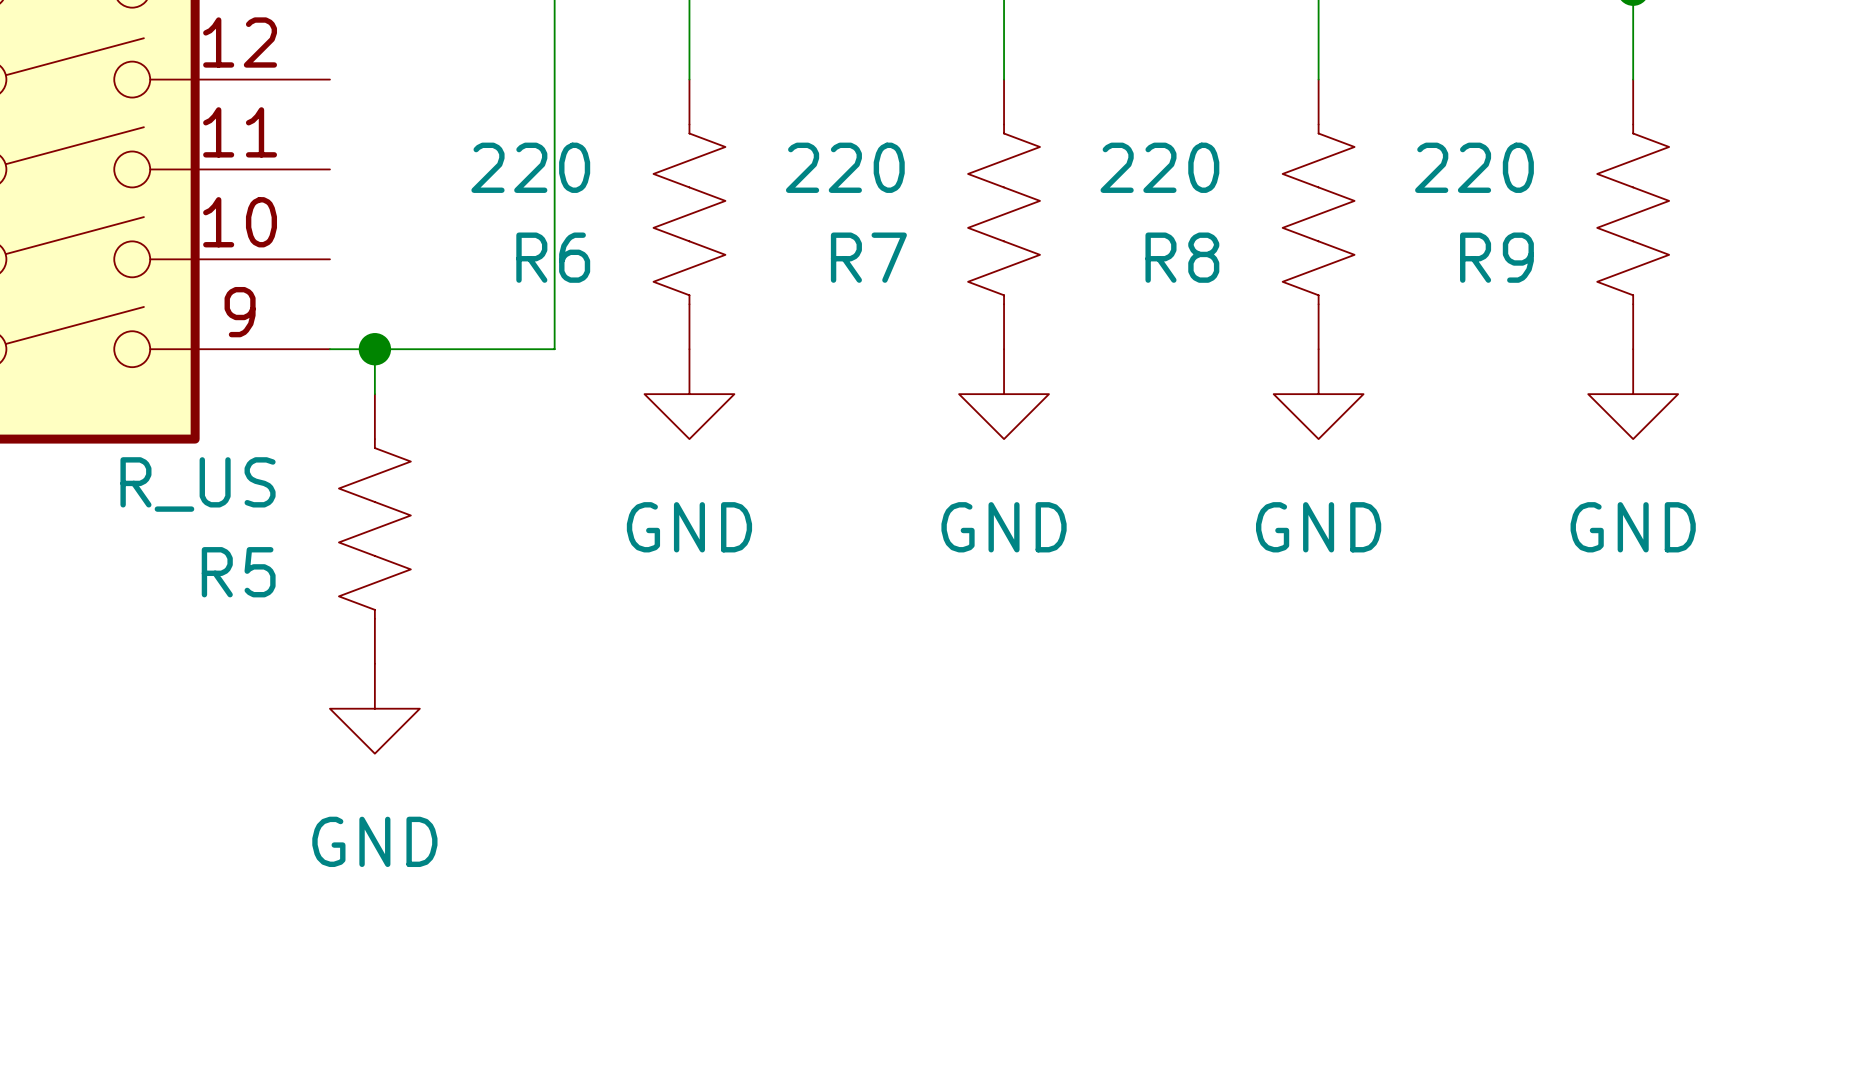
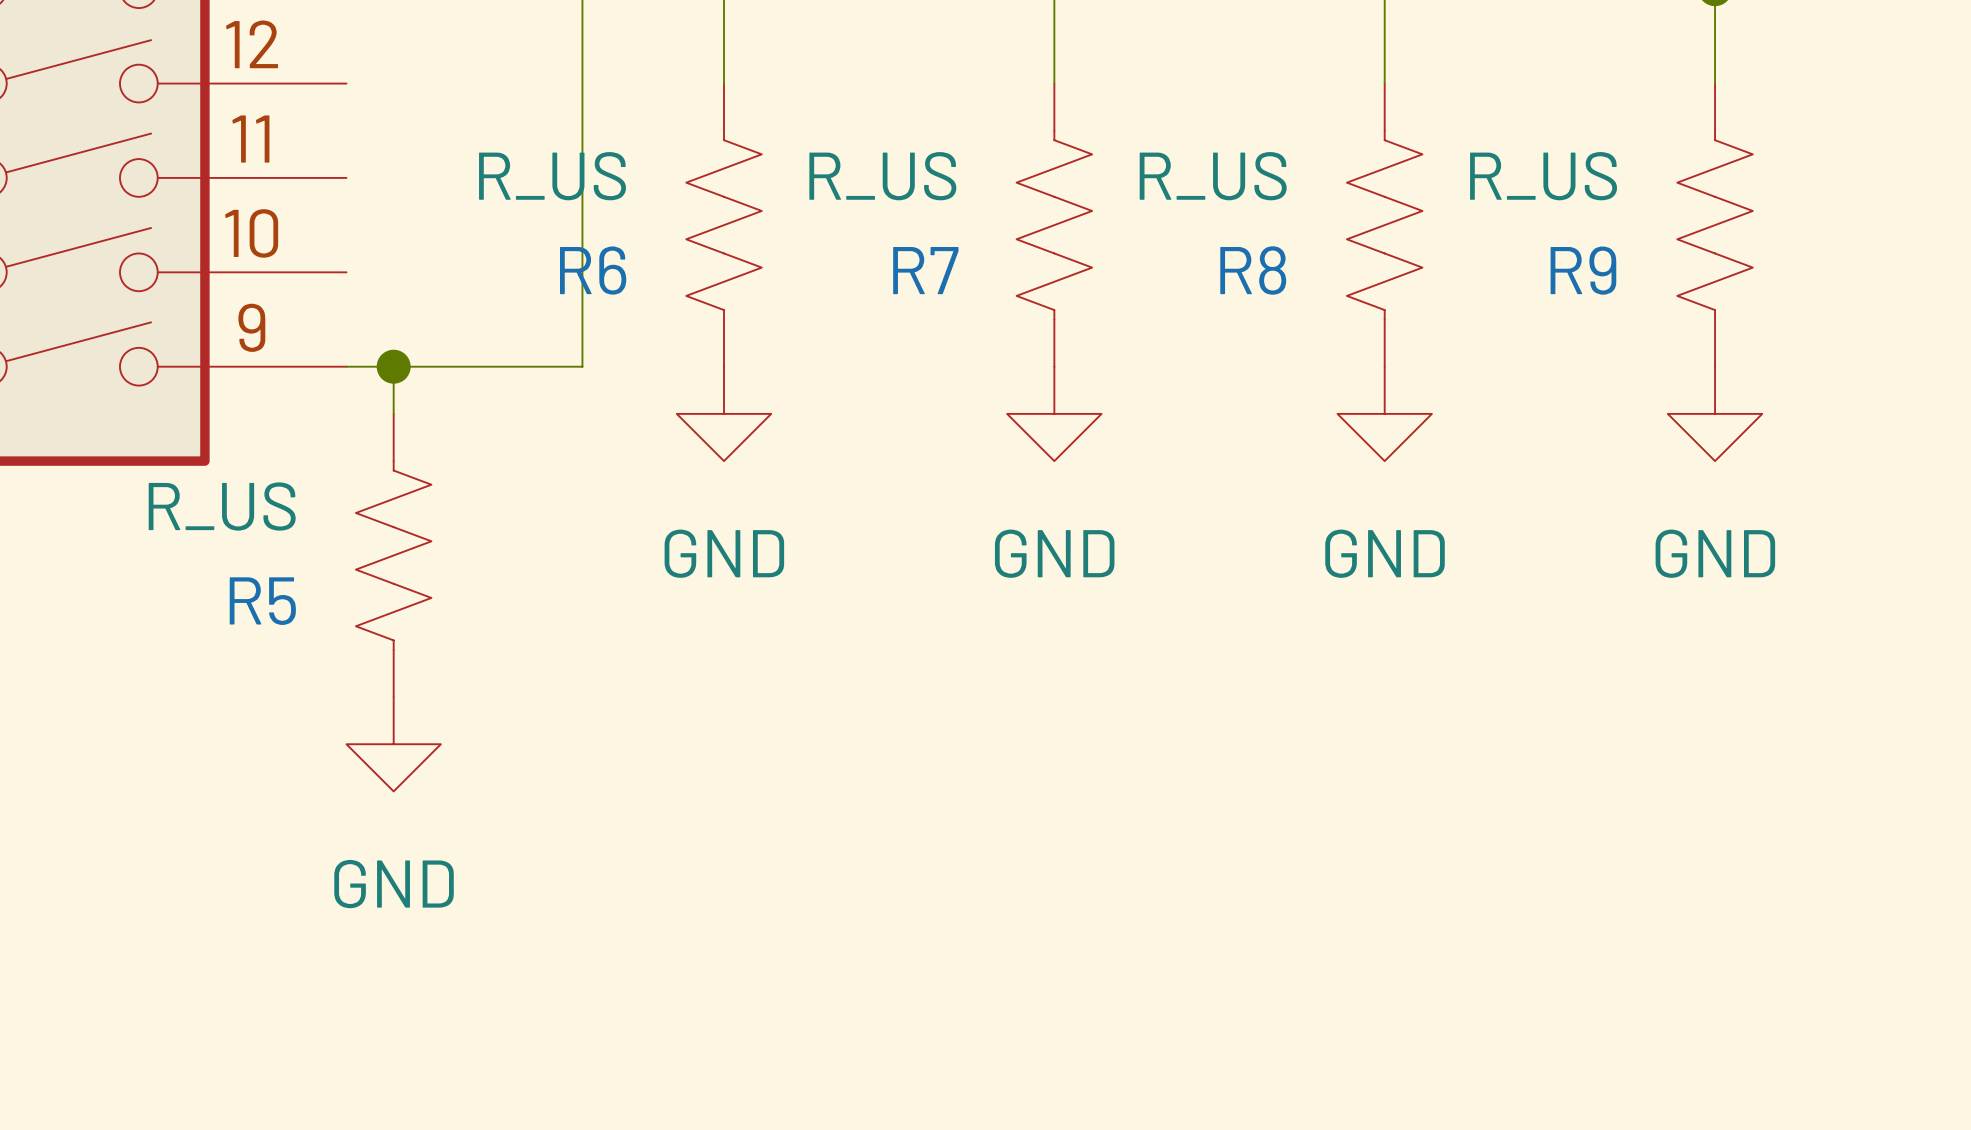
R6 value: 220 (530, 167) -> R_US (552, 176)
R7 value: 220 (845, 167) -> R_US (882, 176)
R8 value: 220 (1159, 167) -> R_US (1213, 176)
R9 value: 220 (1474, 167) -> R_US (1543, 176)

